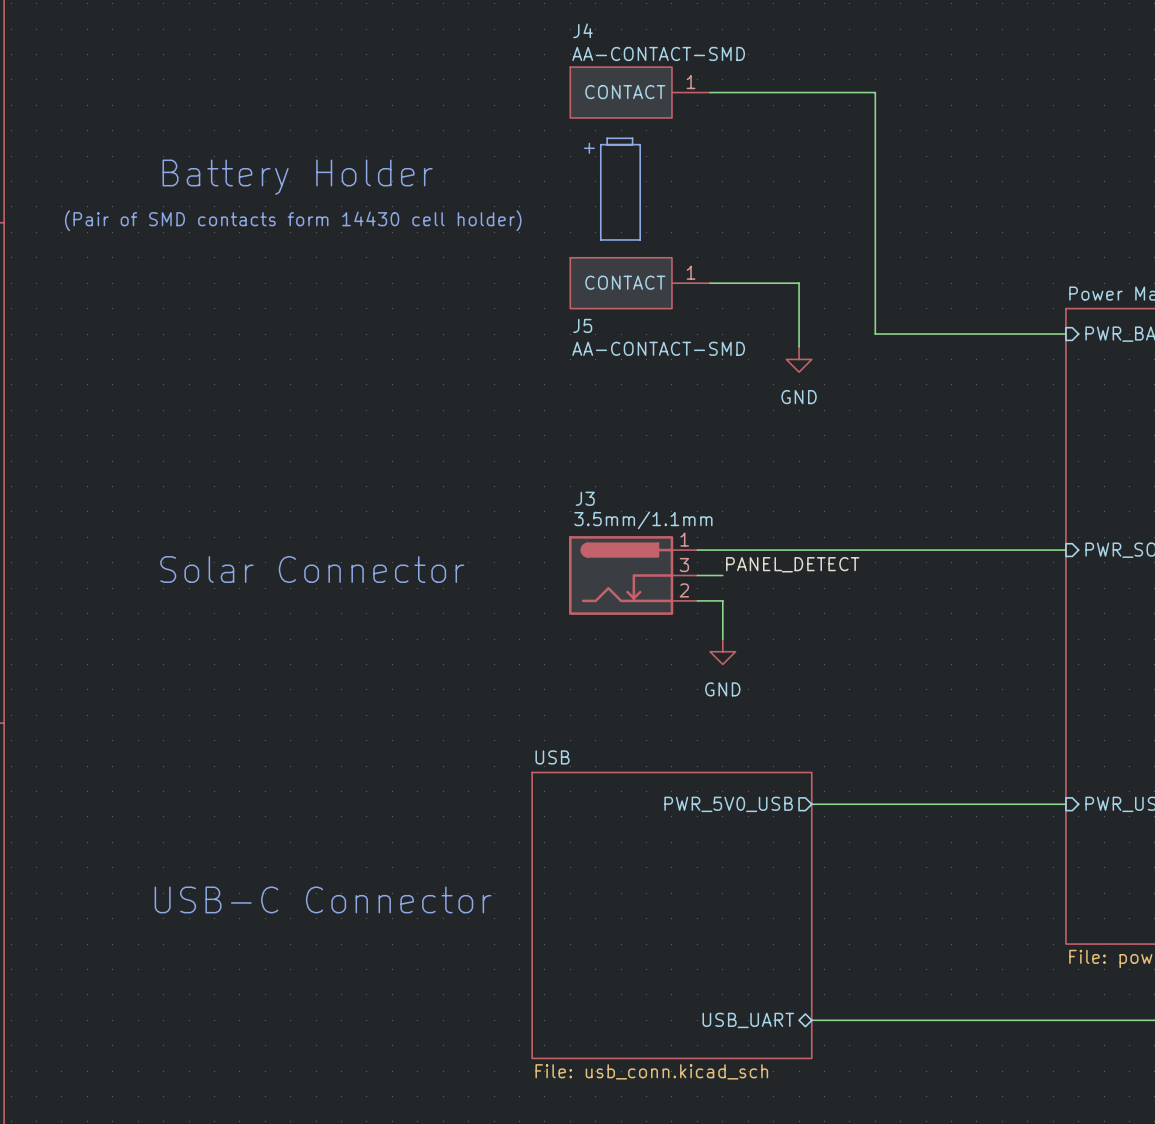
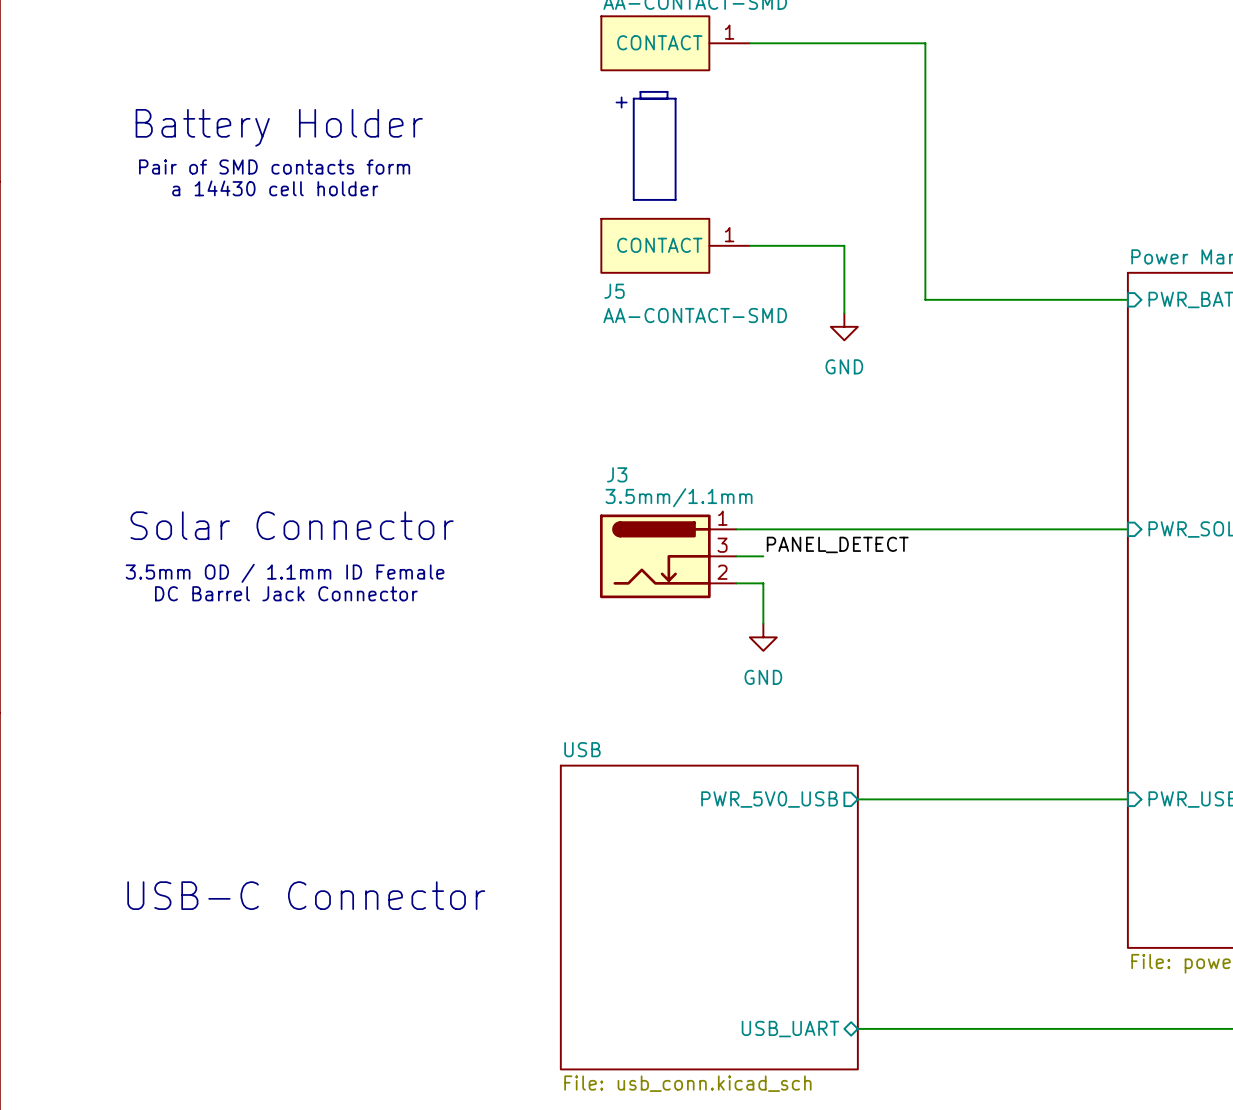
text position: Battery Holder (297, 177) -> Battery Holder (279, 127)
text: (Pair of SMD contacts form 14430 cell holder) (293, 220) -> Pair of SMD contacts form (274, 166)
text: none -> a 14430 cell holder (275, 188)
text position: Solar Connector (312, 569) -> Solar Connector (292, 525)
text: none -> 3.5mm OD / 1.1mm ID Female (285, 573)
text: none -> DC Barrel Jack Connector (286, 593)
text position: USB-C Connector (323, 899) -> USB-C Connector (306, 895)

